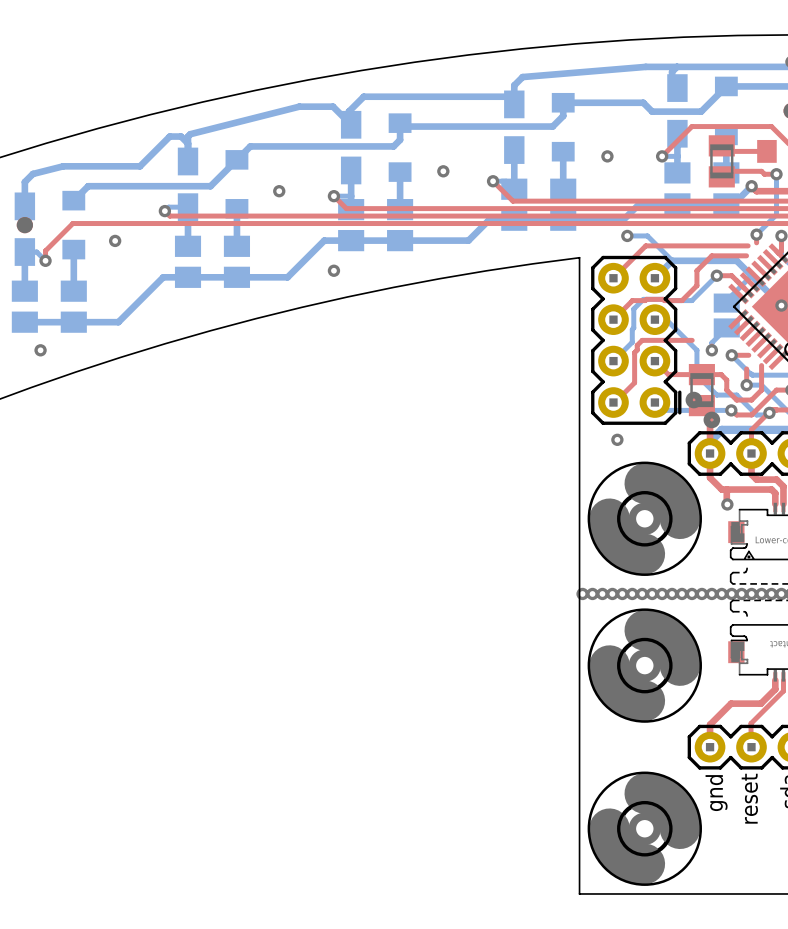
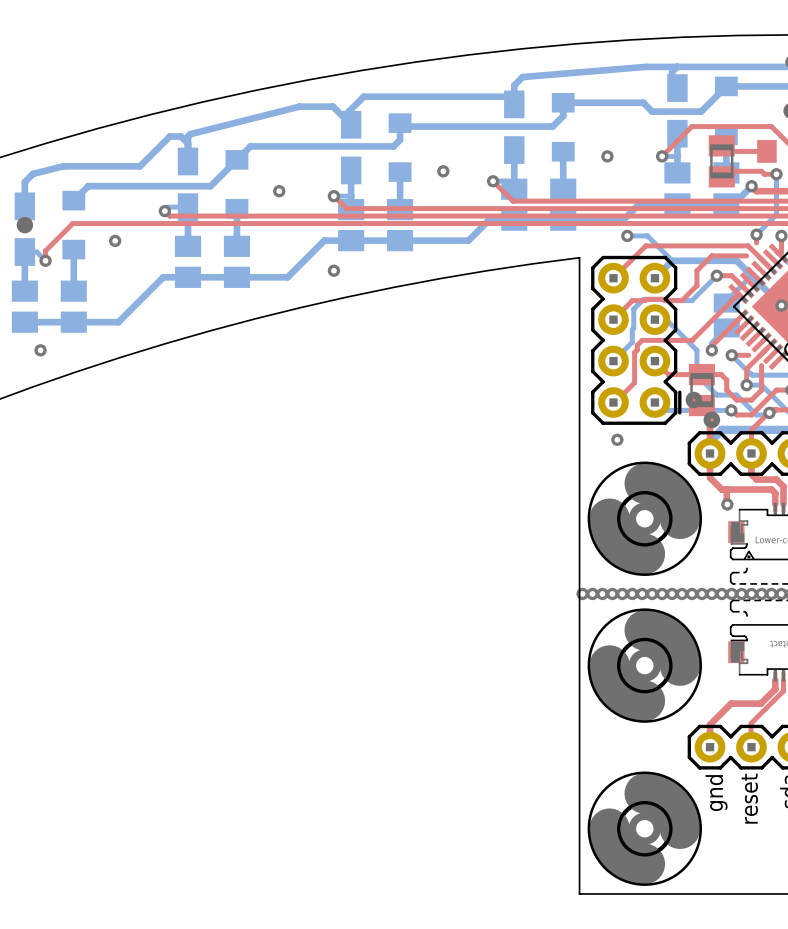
top track: none -> (748, 245) (767, 265)
top track: none -> (738, 293) (692, 340)
top track: none -> (738, 319) (711, 346)
top track: none -> (767, 348) (746, 368)

